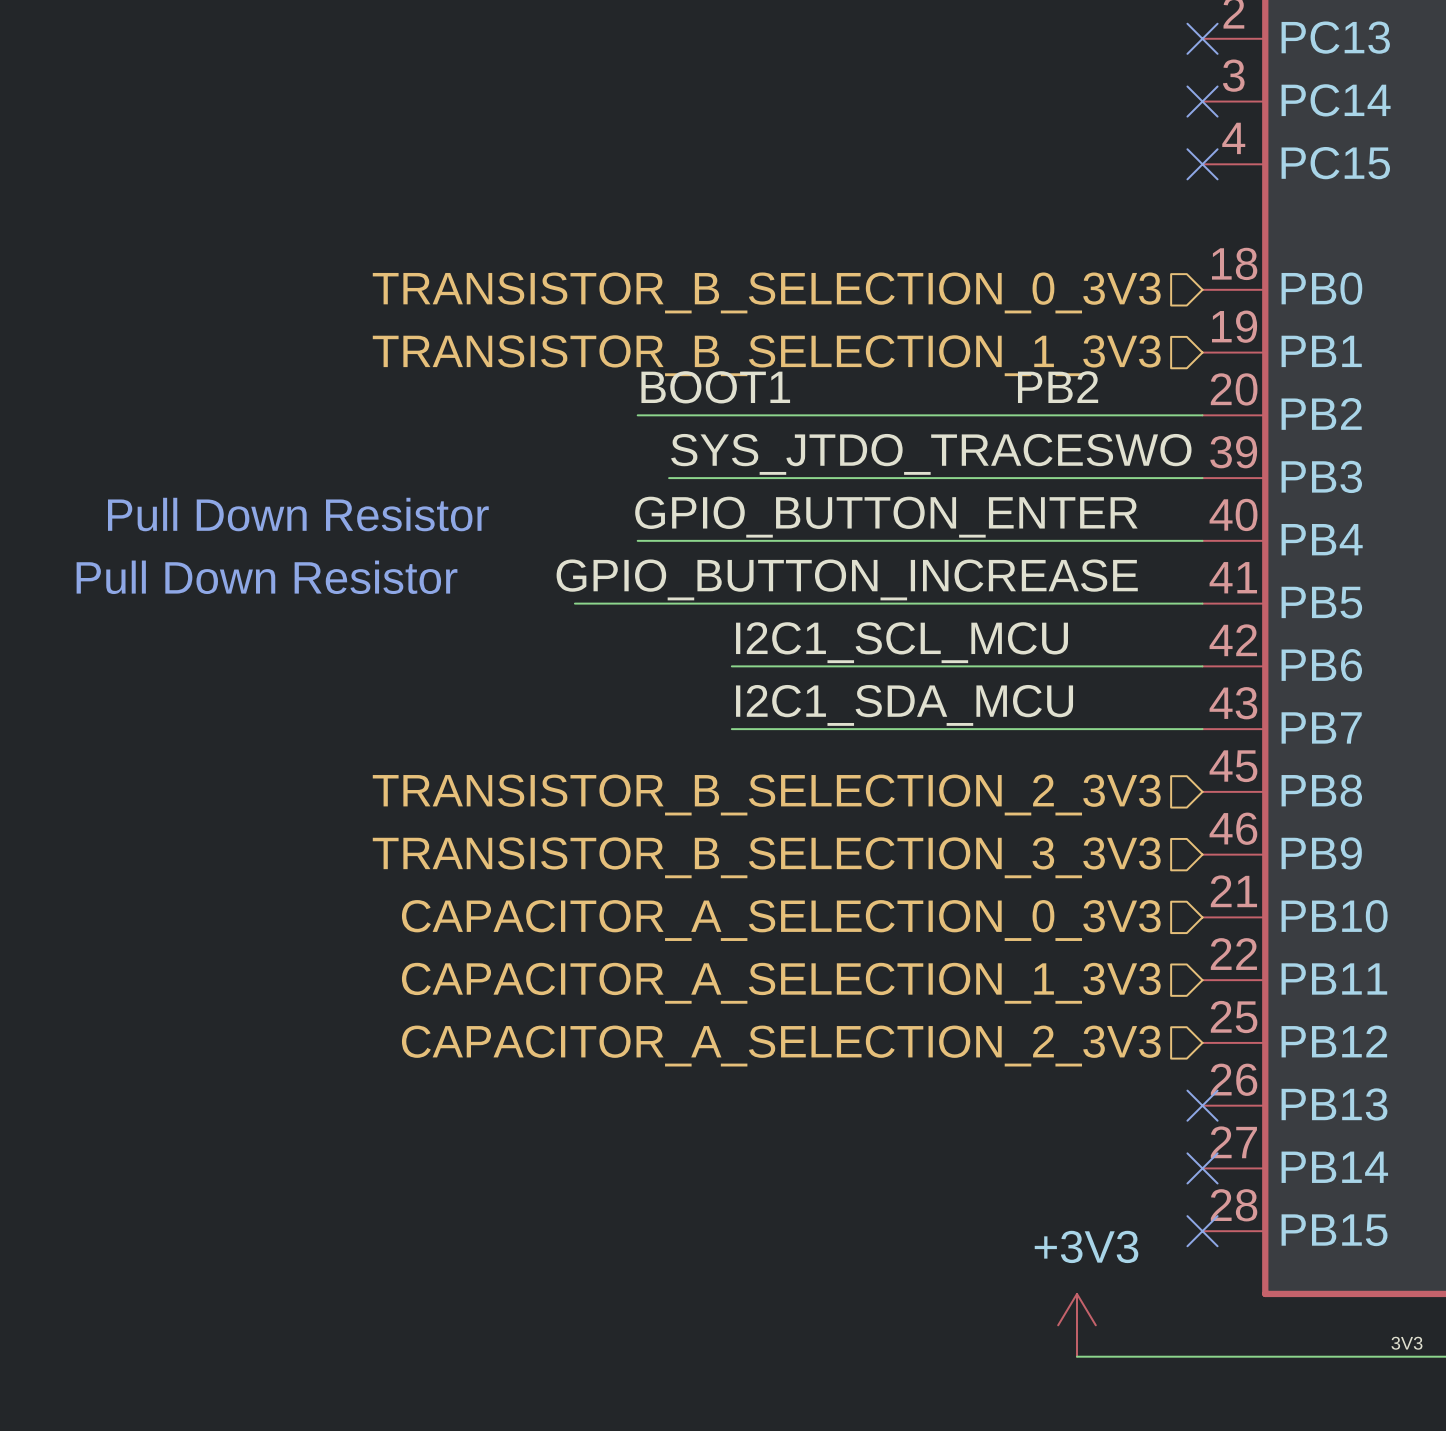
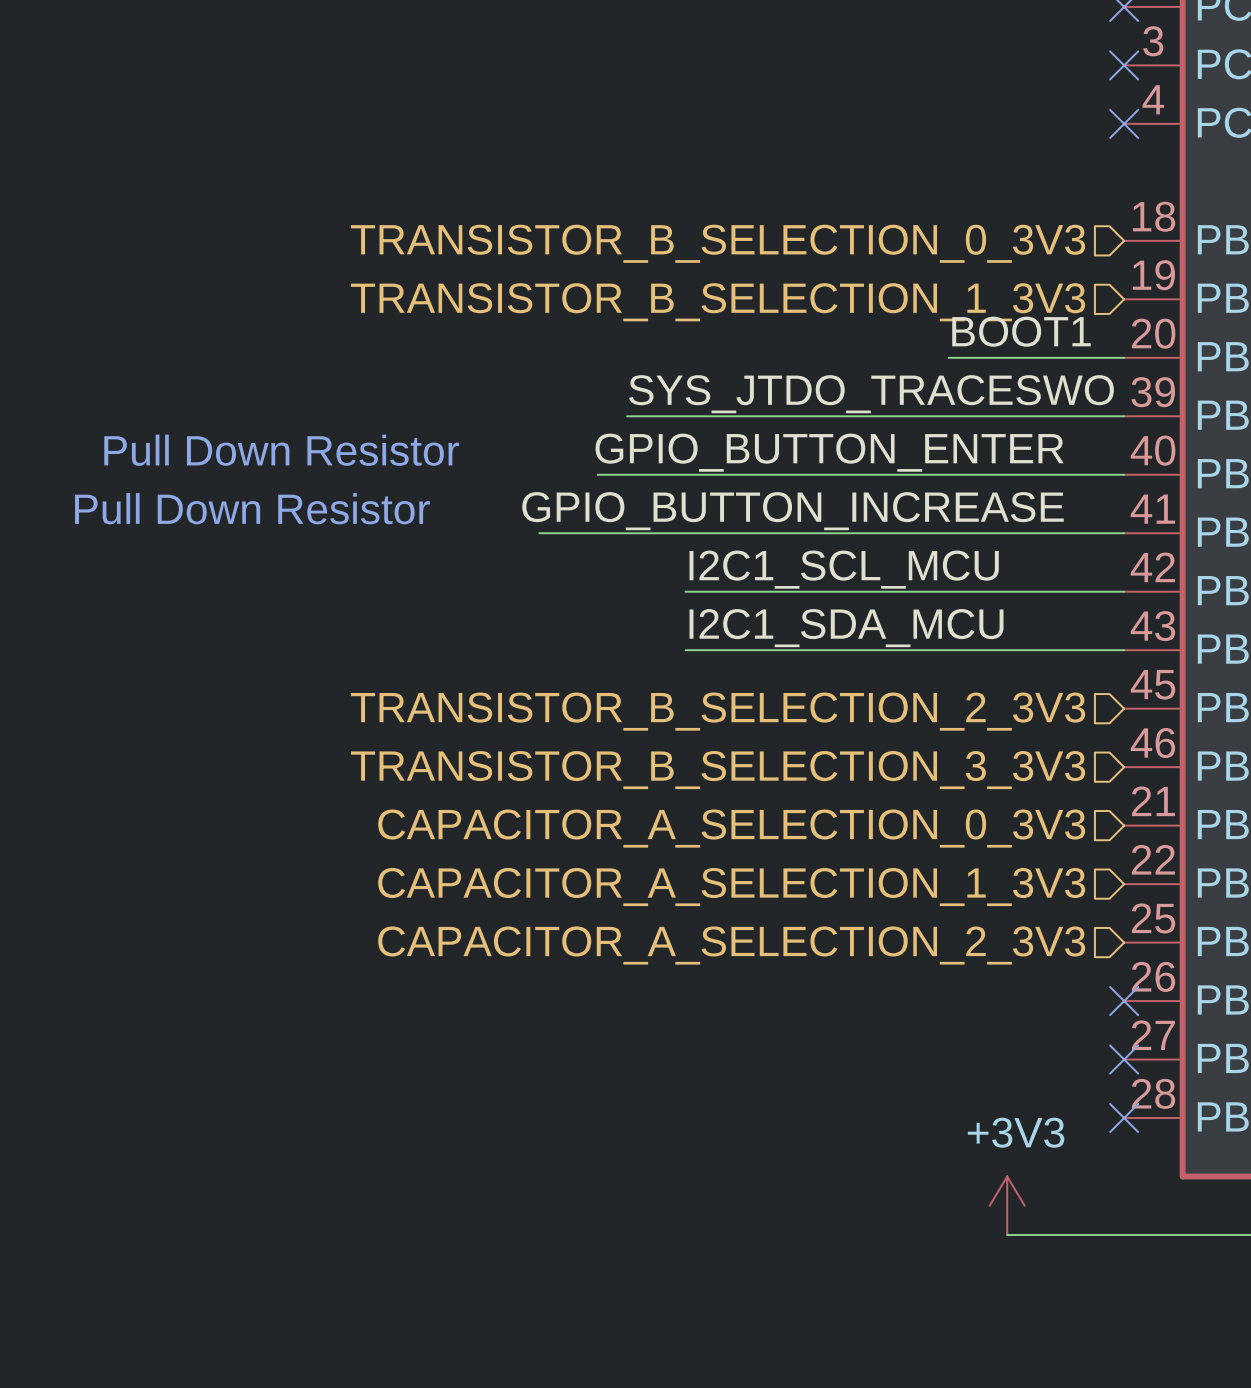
label: BOOT1 (715, 387) -> none
label: PB2 (1058, 387) -> BOOT1 (1021, 331)
wire: (637, 415) (1014, 415) -> none

